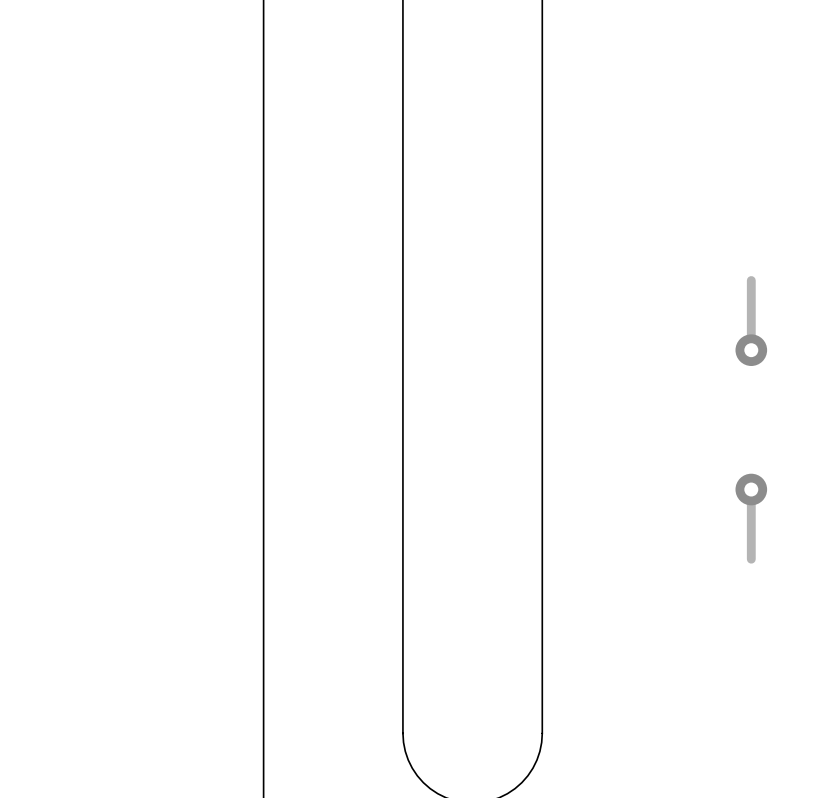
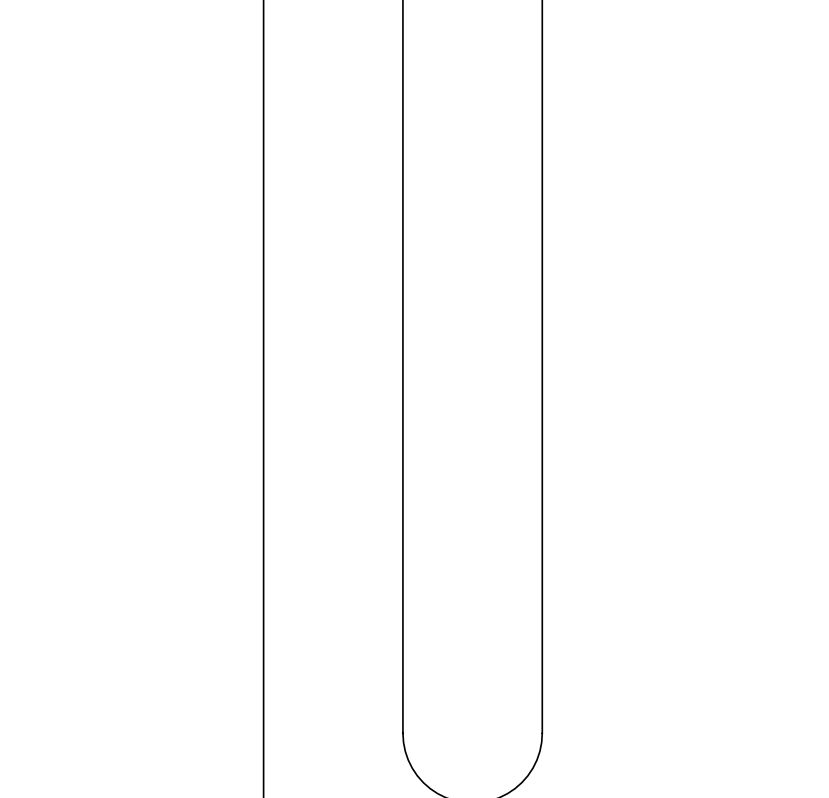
track: (751, 280) (751, 350) -> none
via: (751, 350) -> none
track: (751, 489) (751, 559) -> none
via: (751, 489) -> none

